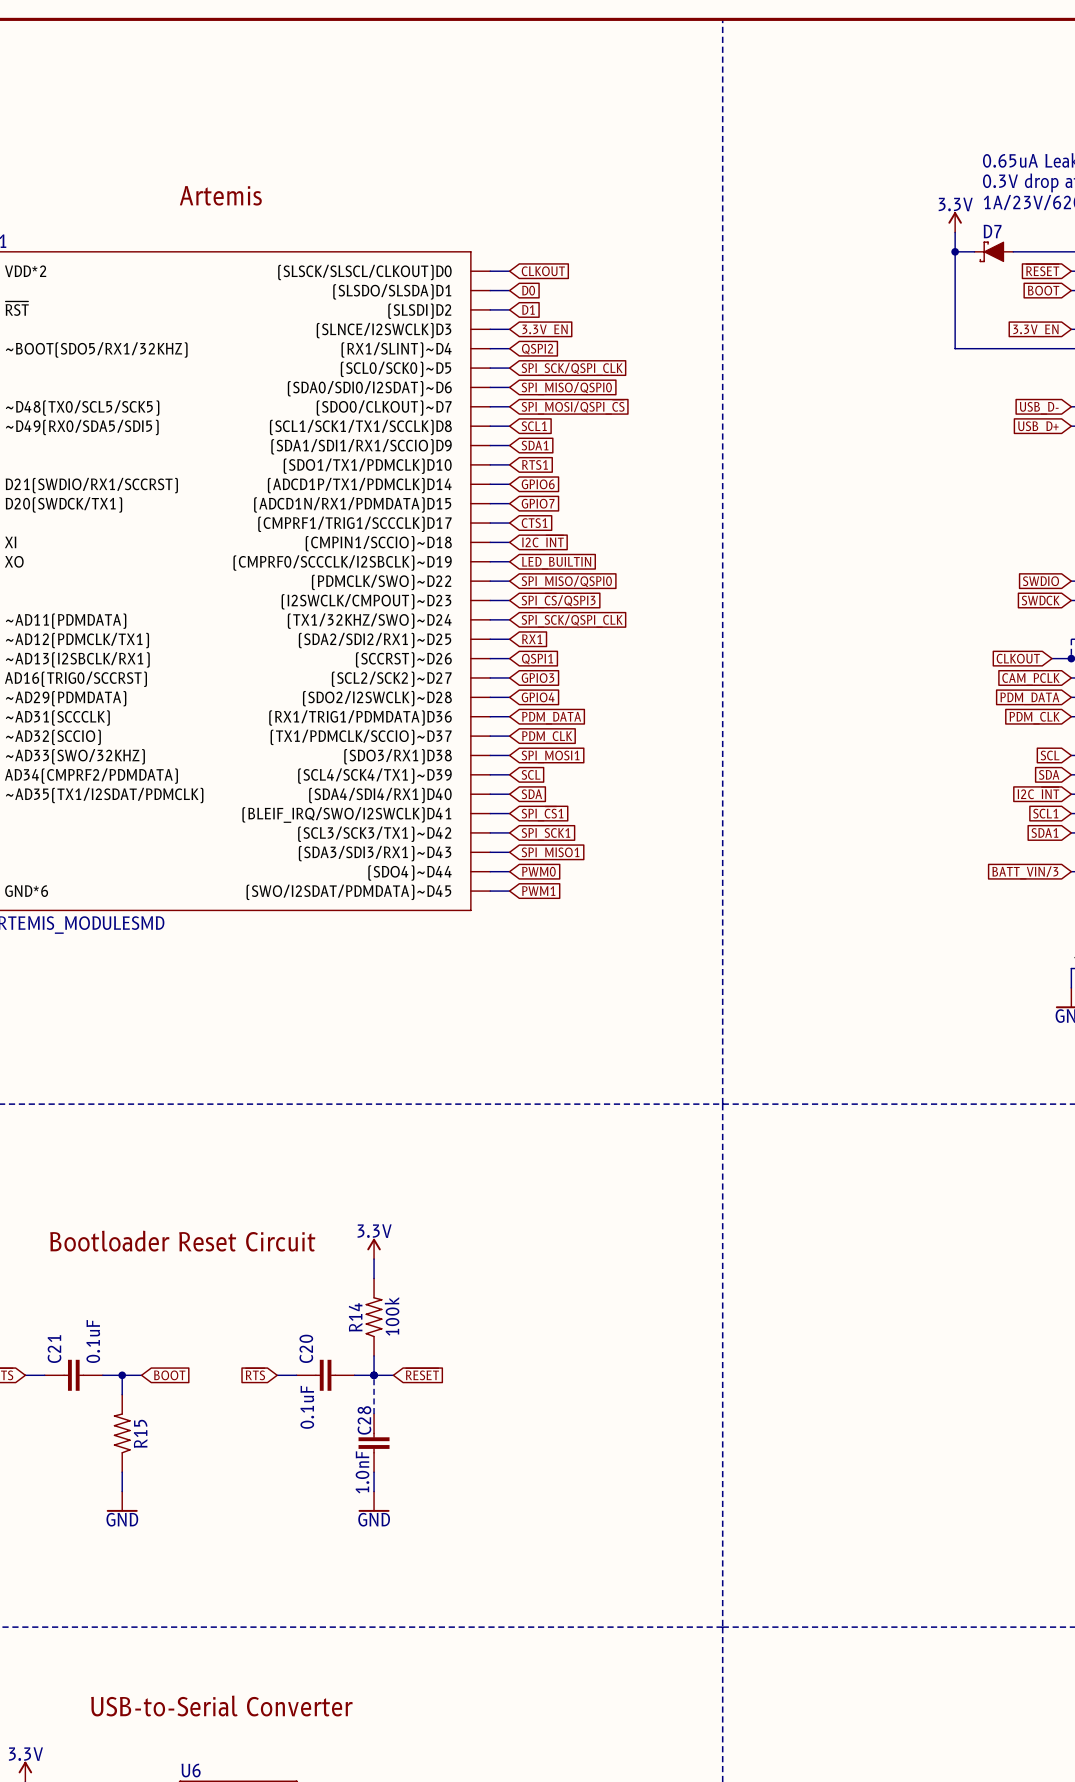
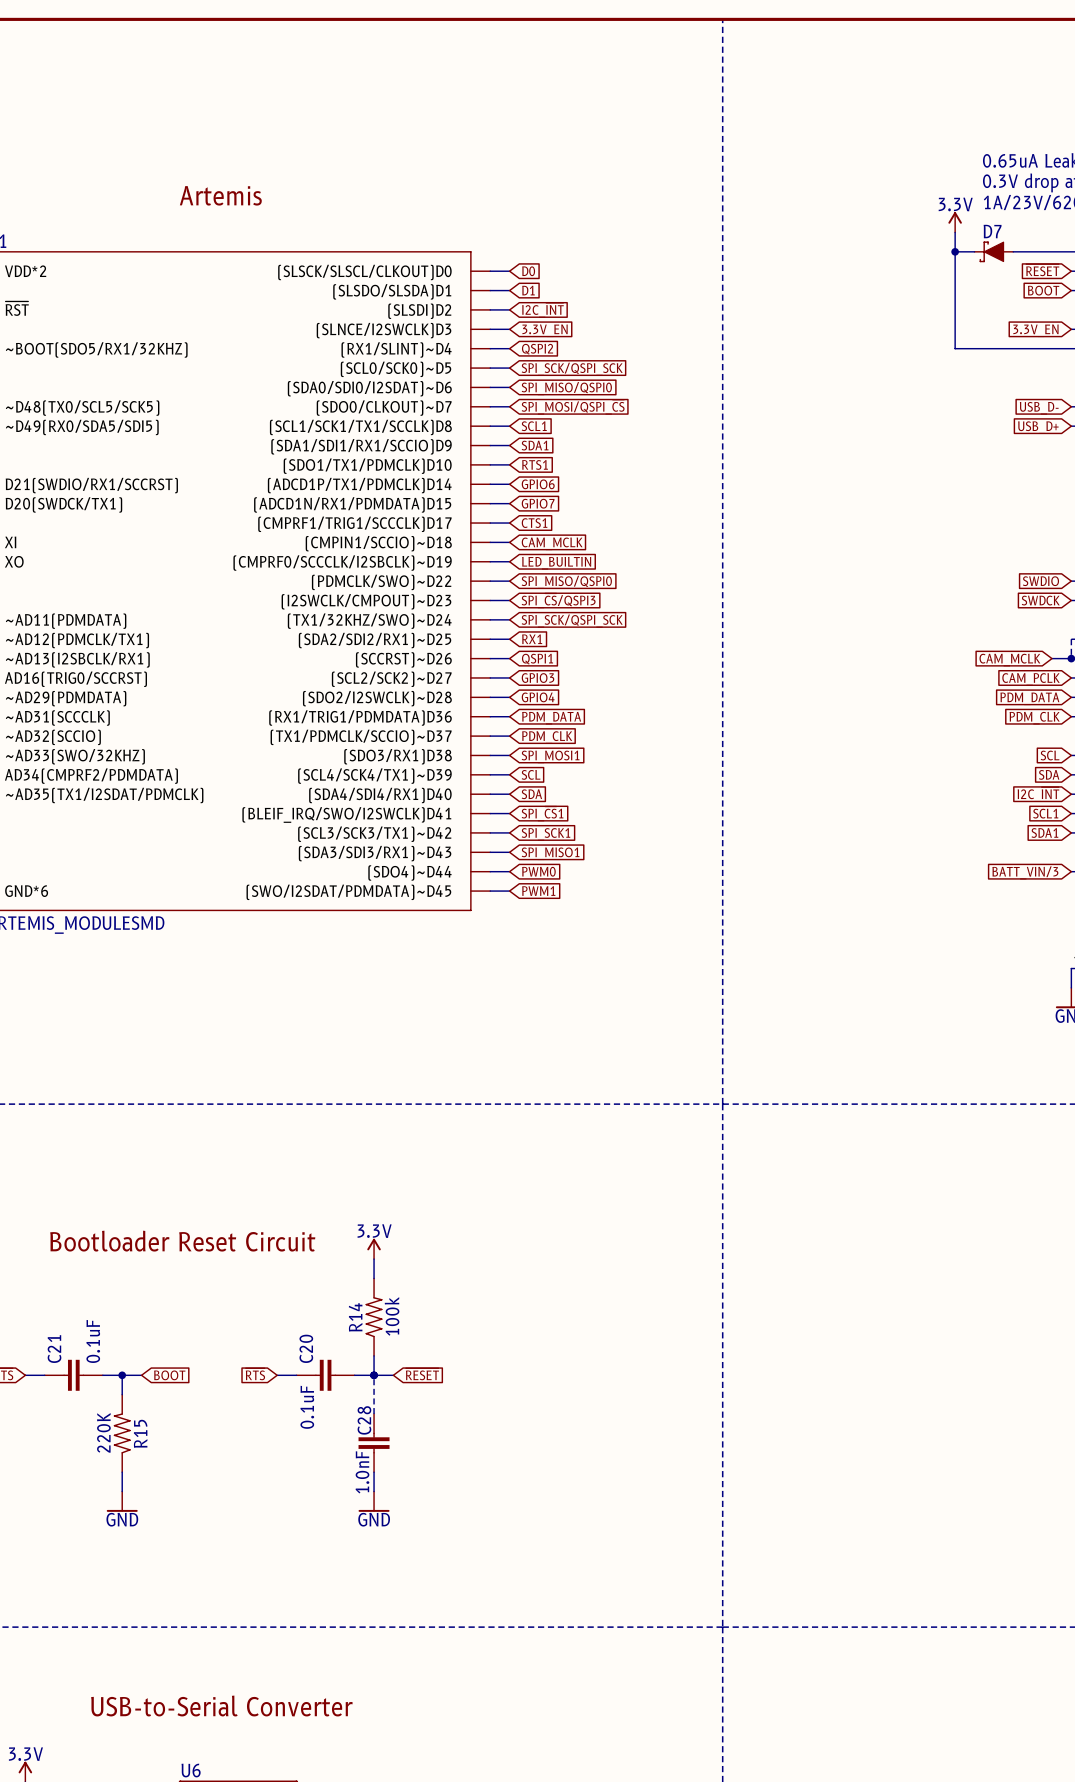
global label: CLKOUT (543, 271) -> D0 (528, 271)
global label: D0 (528, 290) -> D1 (528, 290)
global label: D1 (528, 309) -> I2C_~{INT} (542, 310)
global label: SPI_SCK/QSPI_CLK (572, 369) -> SPI_SCK/QSPI_SCK (572, 369)
global label: I2C_~{INT} (542, 542) -> CAM_MCLK (552, 543)
global label: SPI_SCK/QSPI_CLK (572, 621) -> SPI_SCK/QSPI_SCK (572, 621)
global label: CLKOUT (1018, 658) -> CAM_MCLK (1009, 660)
R15 value: none -> 220K (103, 1432)

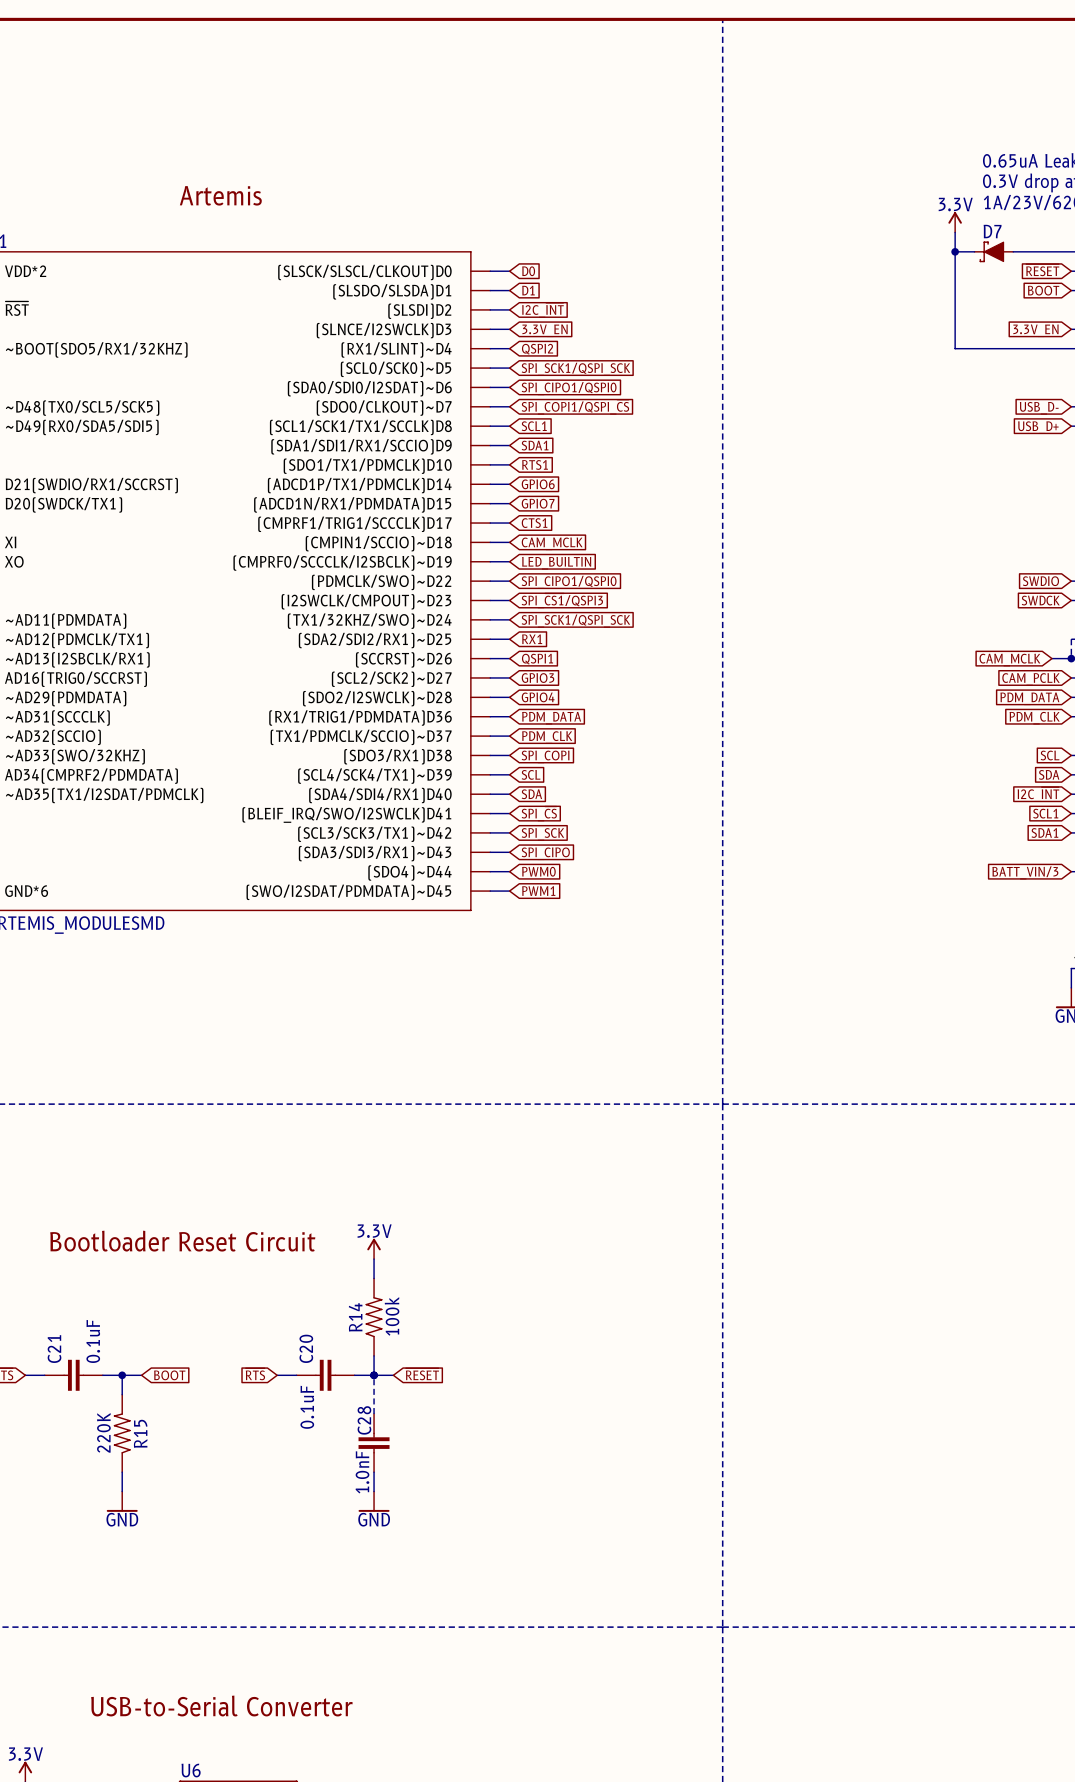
global label: SPI_SCK/QSPI_SCK (572, 369) -> SPI_SCK1/QSPI_SCK (575, 369)
global label: SPI_MISO/QSPI0 (566, 388) -> SPI_CIPO1/QSPI0 (569, 388)
global label: SPI_MOSI/QSPI_~{CS} (573, 407) -> SPI_COPI1/QSPI_~{CS} (575, 407)
global label: SPI_MISO/QSPI0 (566, 582) -> SPI_CIPO1/QSPI0 (569, 582)
global label: SPI_~{CS}/QSPI3 (558, 600) -> SPI_~{CS1}/QSPI3 (562, 600)
global label: SPI_SCK/QSPI_SCK (572, 621) -> SPI_SCK1/QSPI_SCK (575, 621)
global label: SPI_MOSI1 (550, 756) -> SPI_COPI (545, 756)
global label: SPI_~{CS}1 (542, 813) -> SPI_~{CS} (539, 813)
global label: SPI_SCK1 (545, 834) -> SPI_SCK (542, 834)
global label: SPI_MISO1 (550, 853) -> SPI_CIPO (545, 853)

